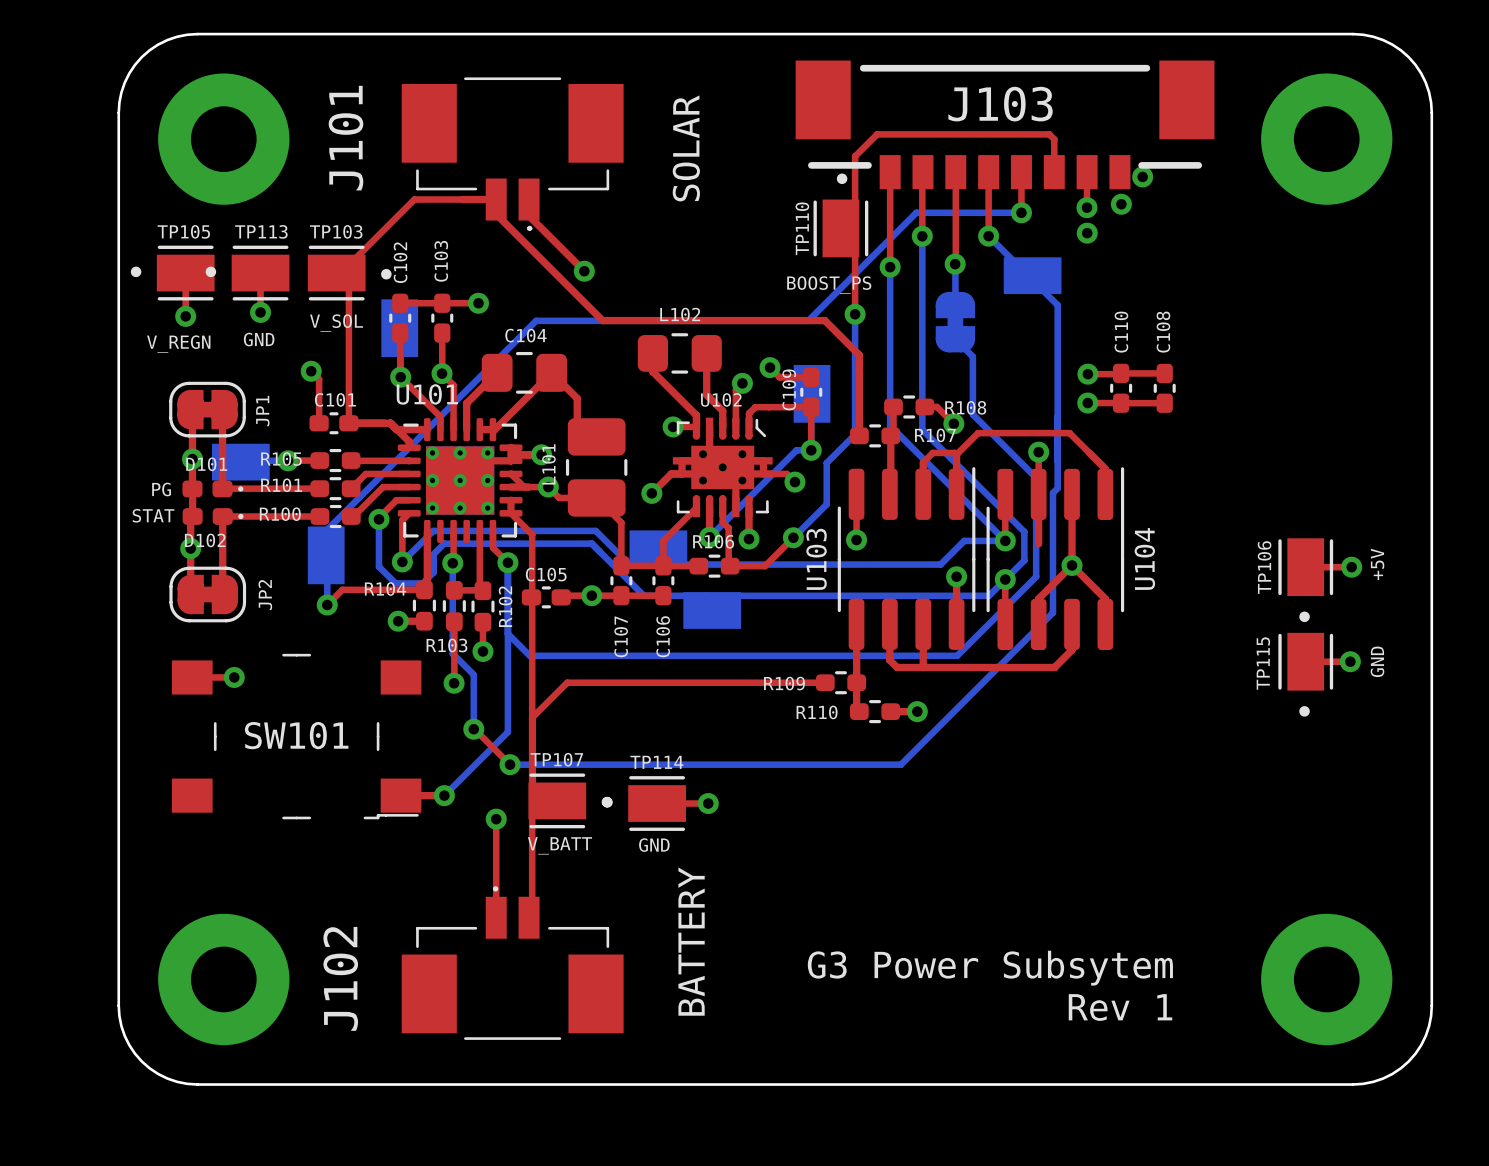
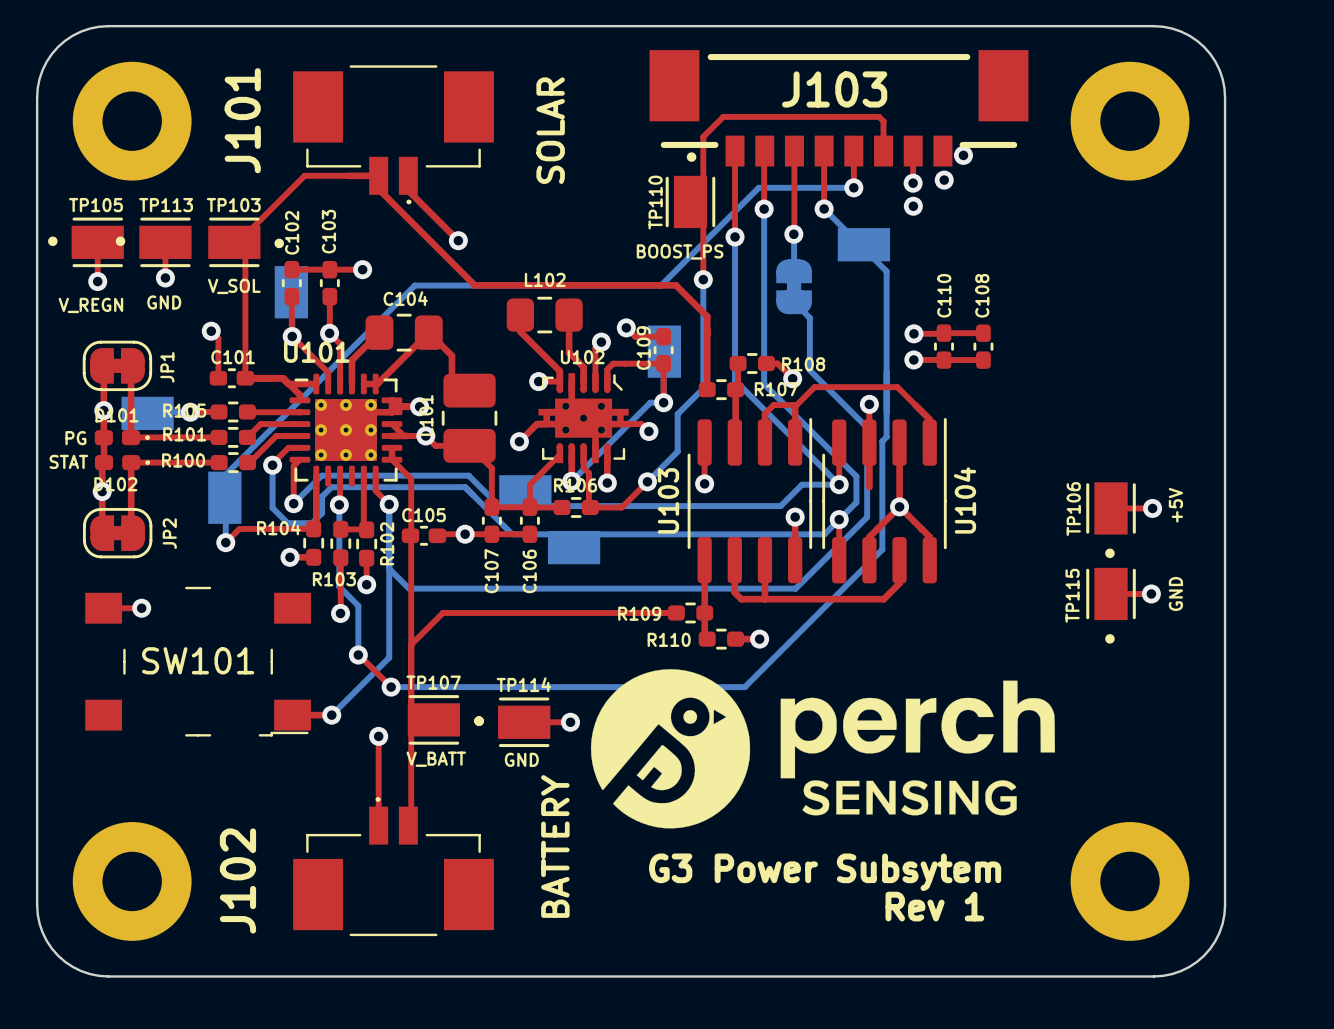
drawing: none -> [590, 669, 1056, 829]

